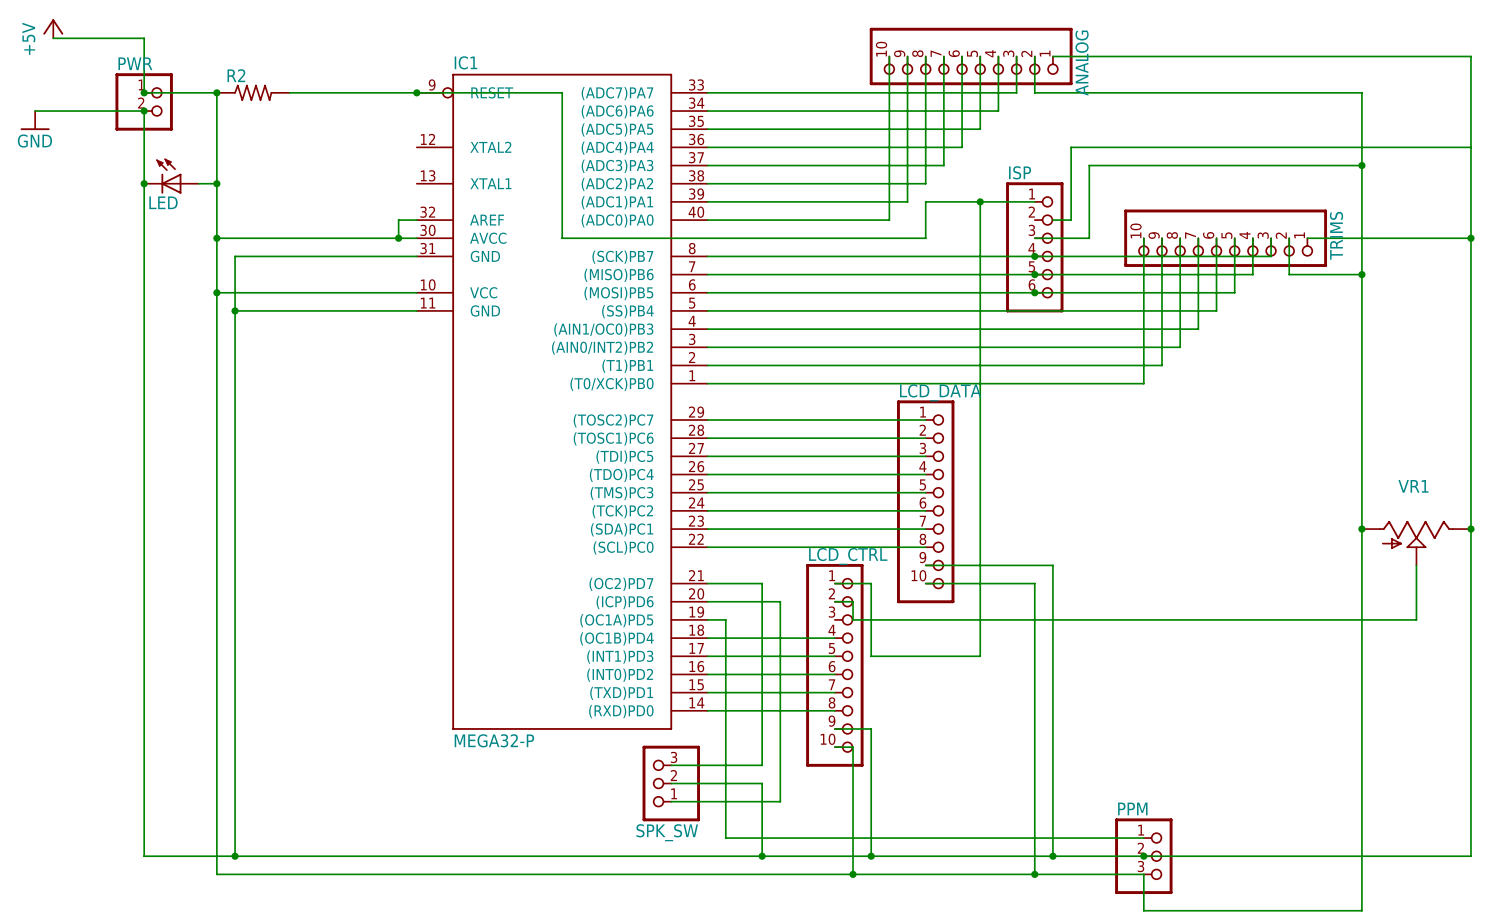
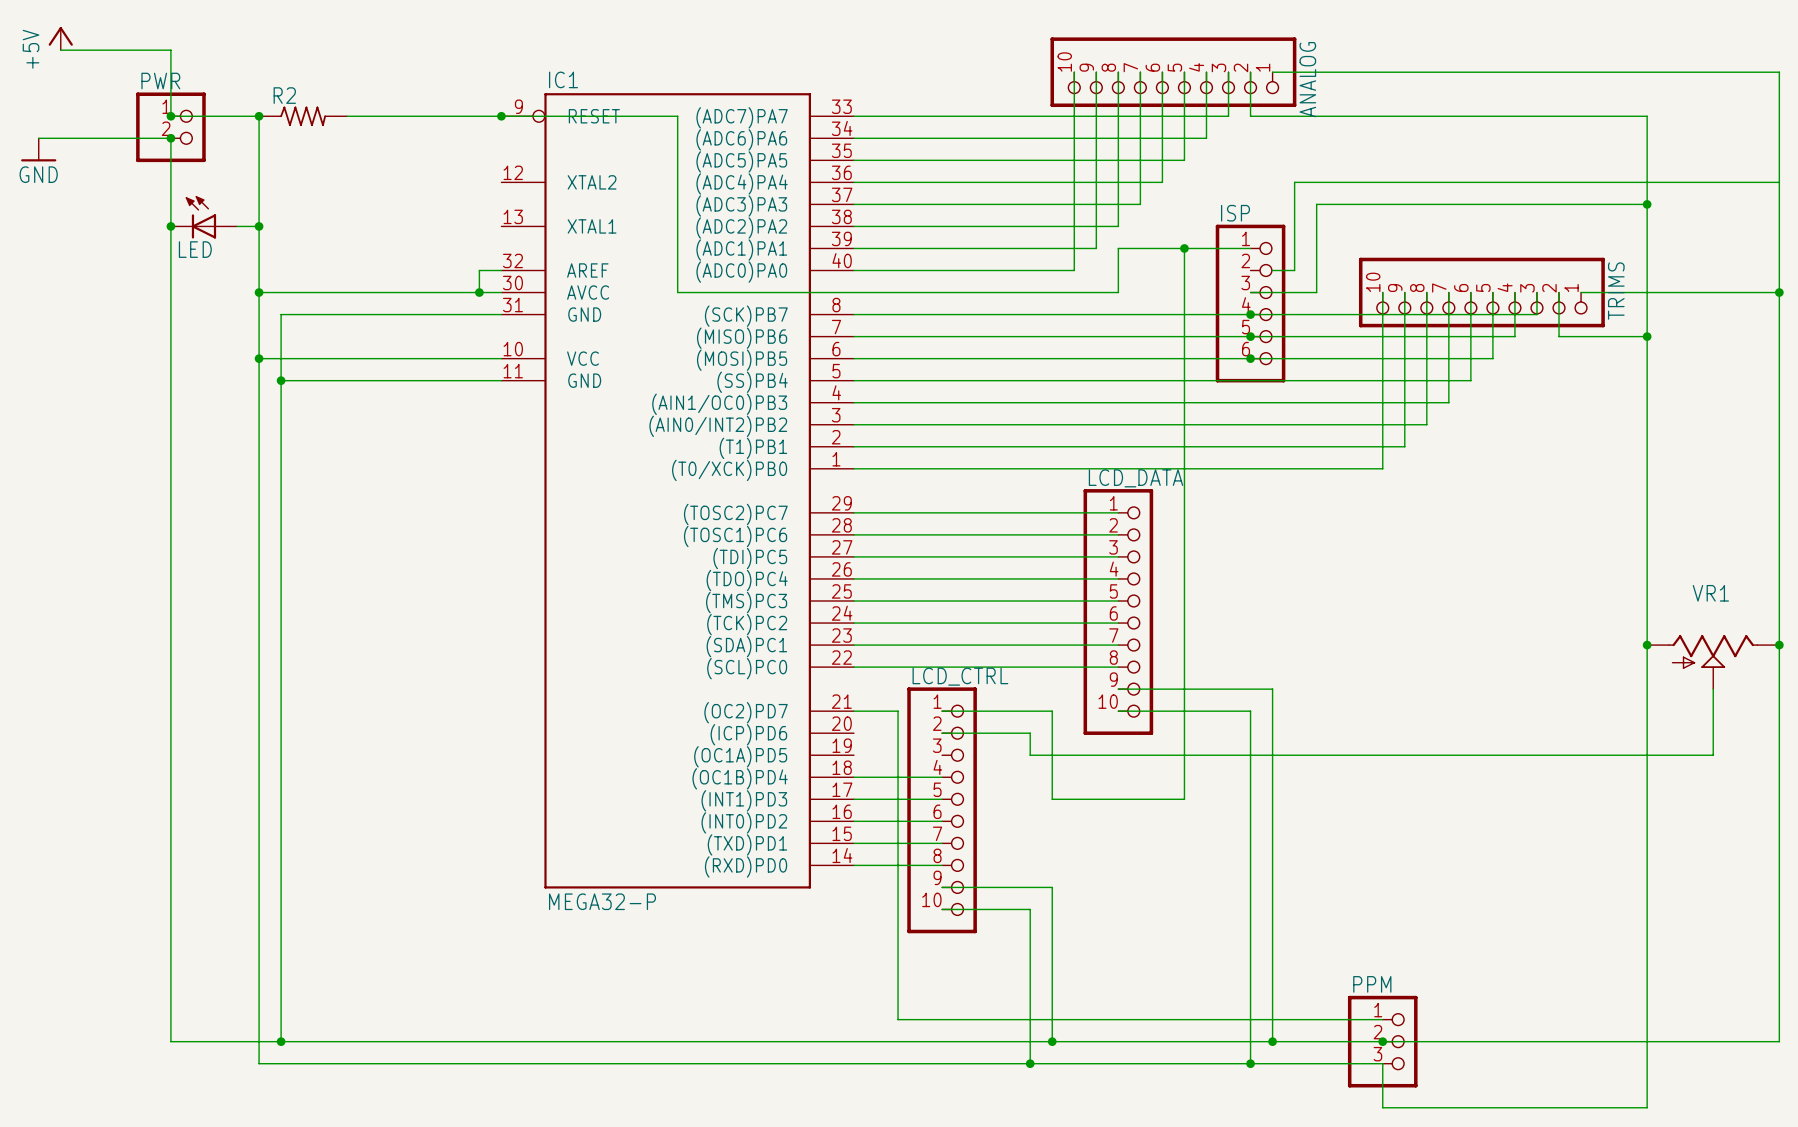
wire: (743, 583) (762, 583) (762, 765) (671, 765) -> none
wire: (707, 601) (780, 601) (780, 801) (671, 801) -> none
wire: (707, 619) (725, 619) (725, 838) (743, 838) -> (898, 711) (898, 1019)
wire: (780, 638) (834, 638) -> (942, 711) (1008, 711)
wire: (780, 656) (834, 656) -> (942, 733) (1008, 733)
LCD_CTRL position: (834, 665) -> (942, 810)
wire: (780, 674) (834, 674) -> none
wire: (780, 692) (834, 692) -> (942, 887) (1008, 887)
wire: (780, 710) (834, 710) -> (942, 909) (1008, 909)
wire: (671, 783) (762, 783) (762, 856) -> none
SPK_SW: (671, 783) -> none
junction: (762, 856) -> none

